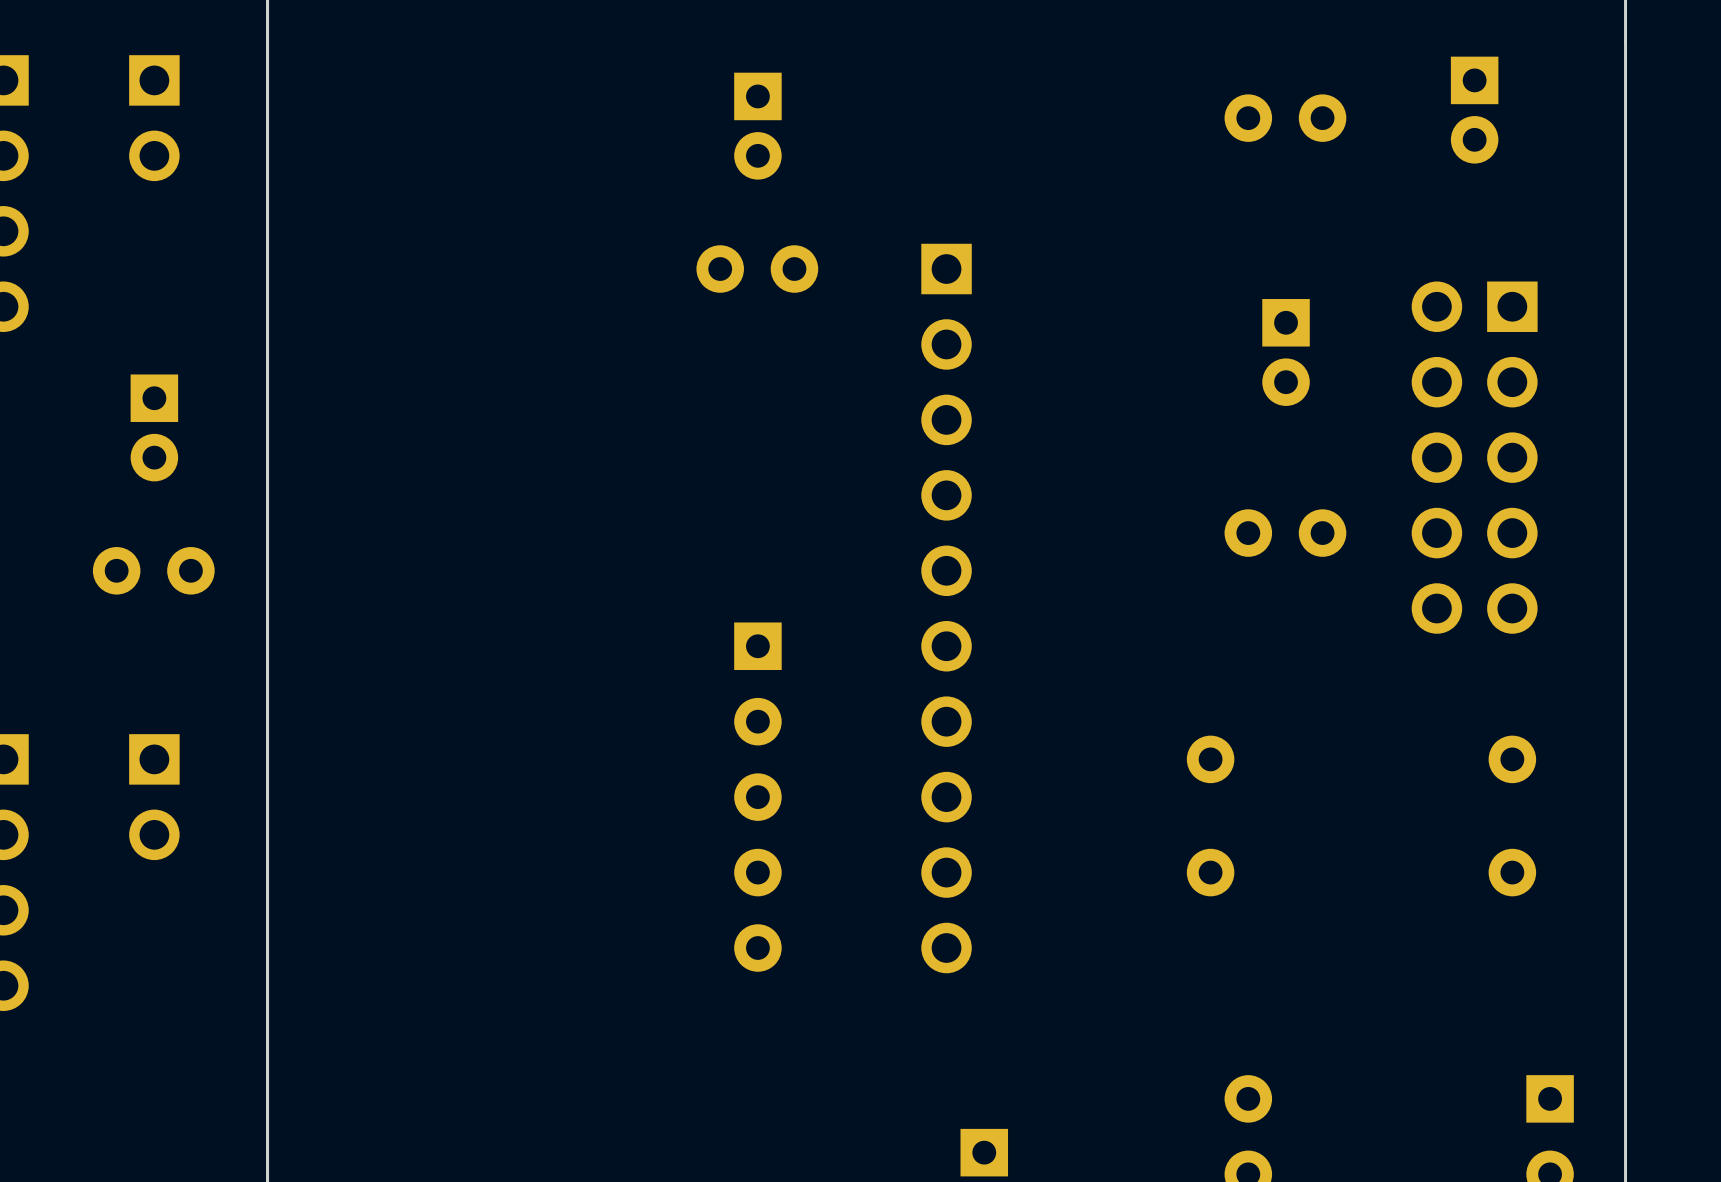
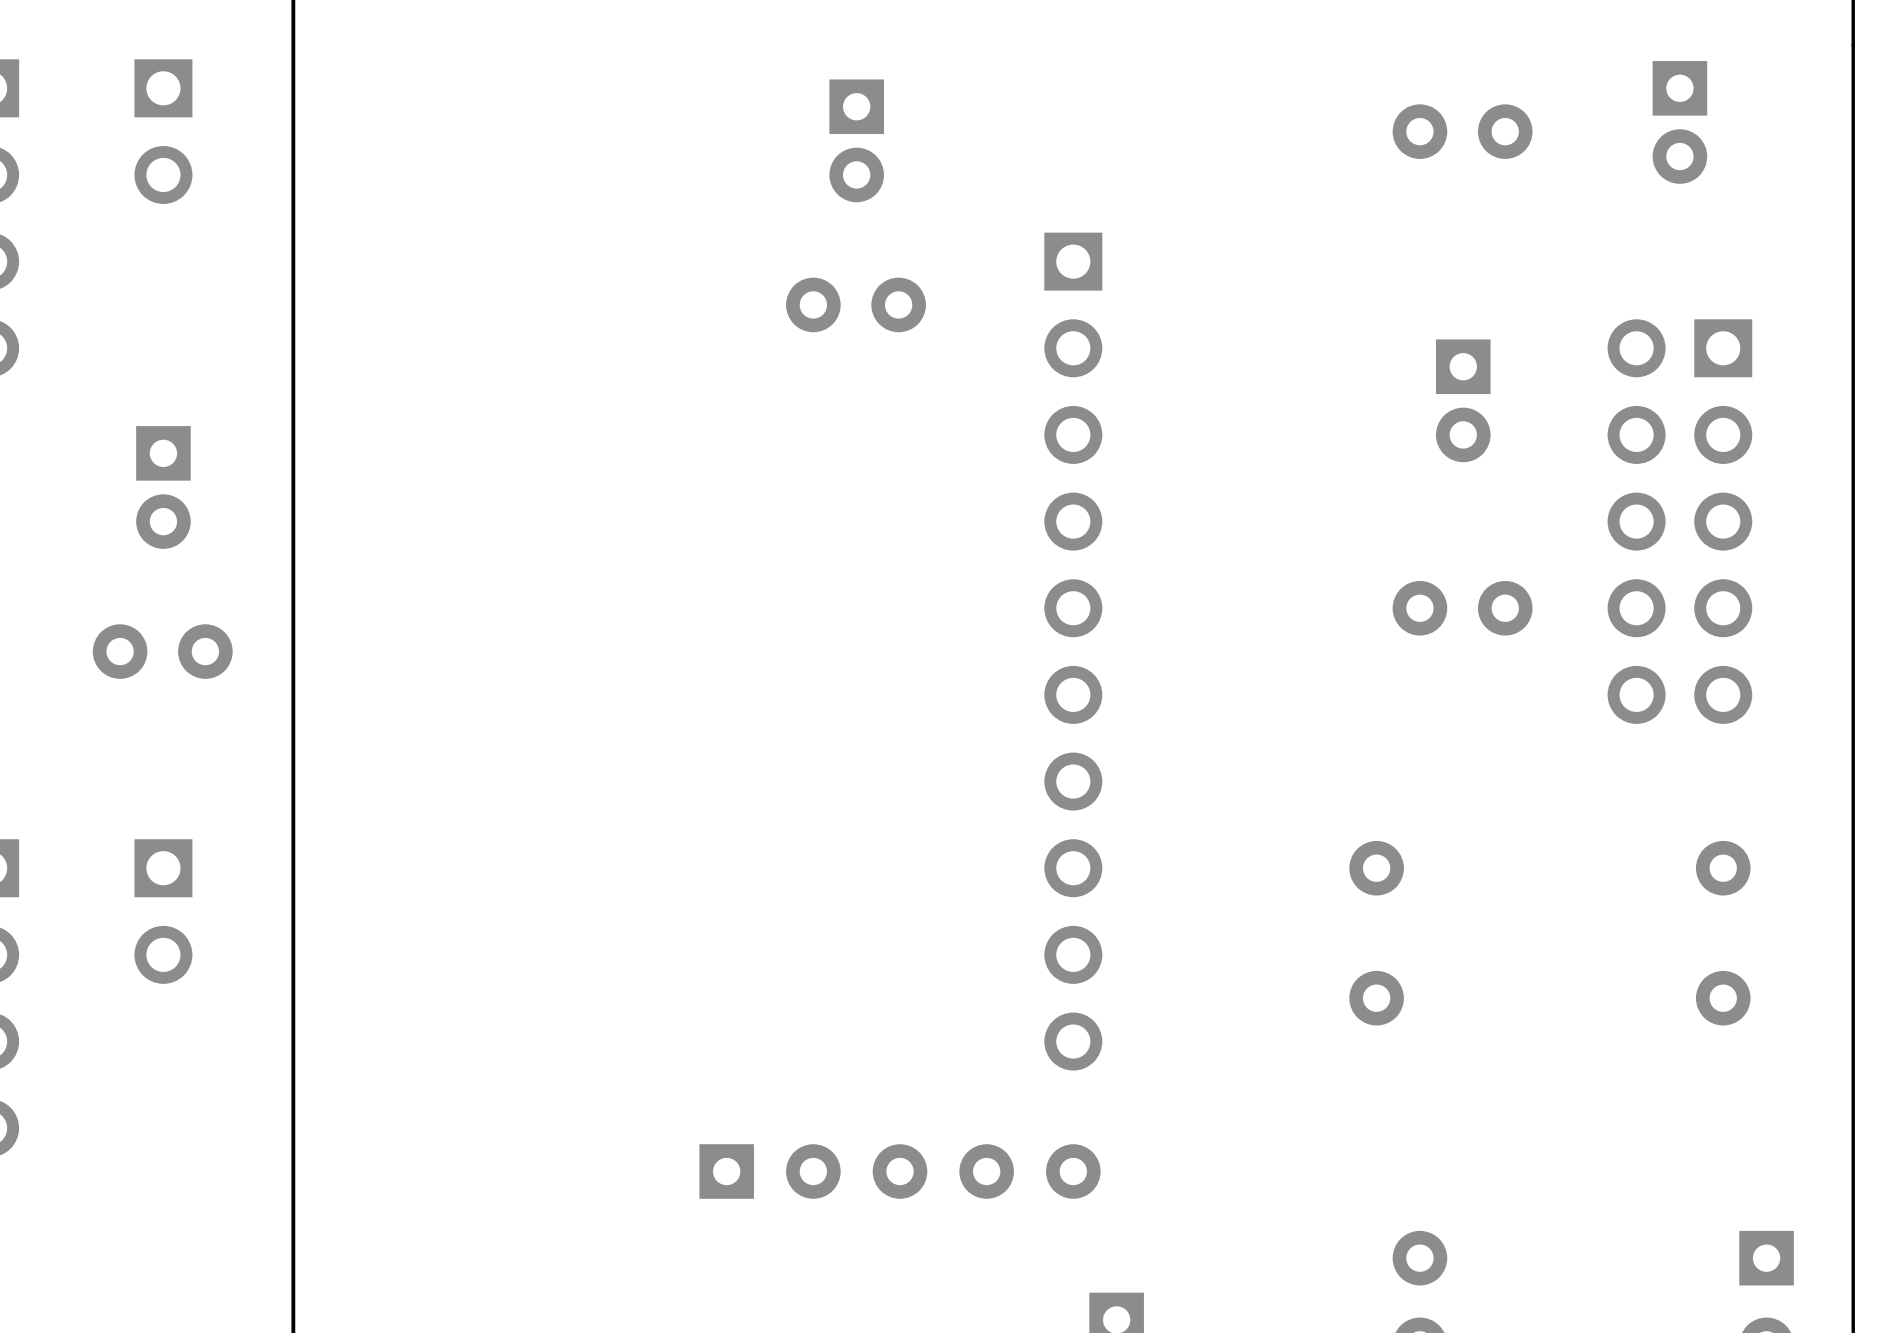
part position: (946, 608) -> (1073, 651)
part rotation: 0° (757, 797) -> 90° counterclockwise (900, 1171)
part position: (757, 797) -> (900, 1171)

